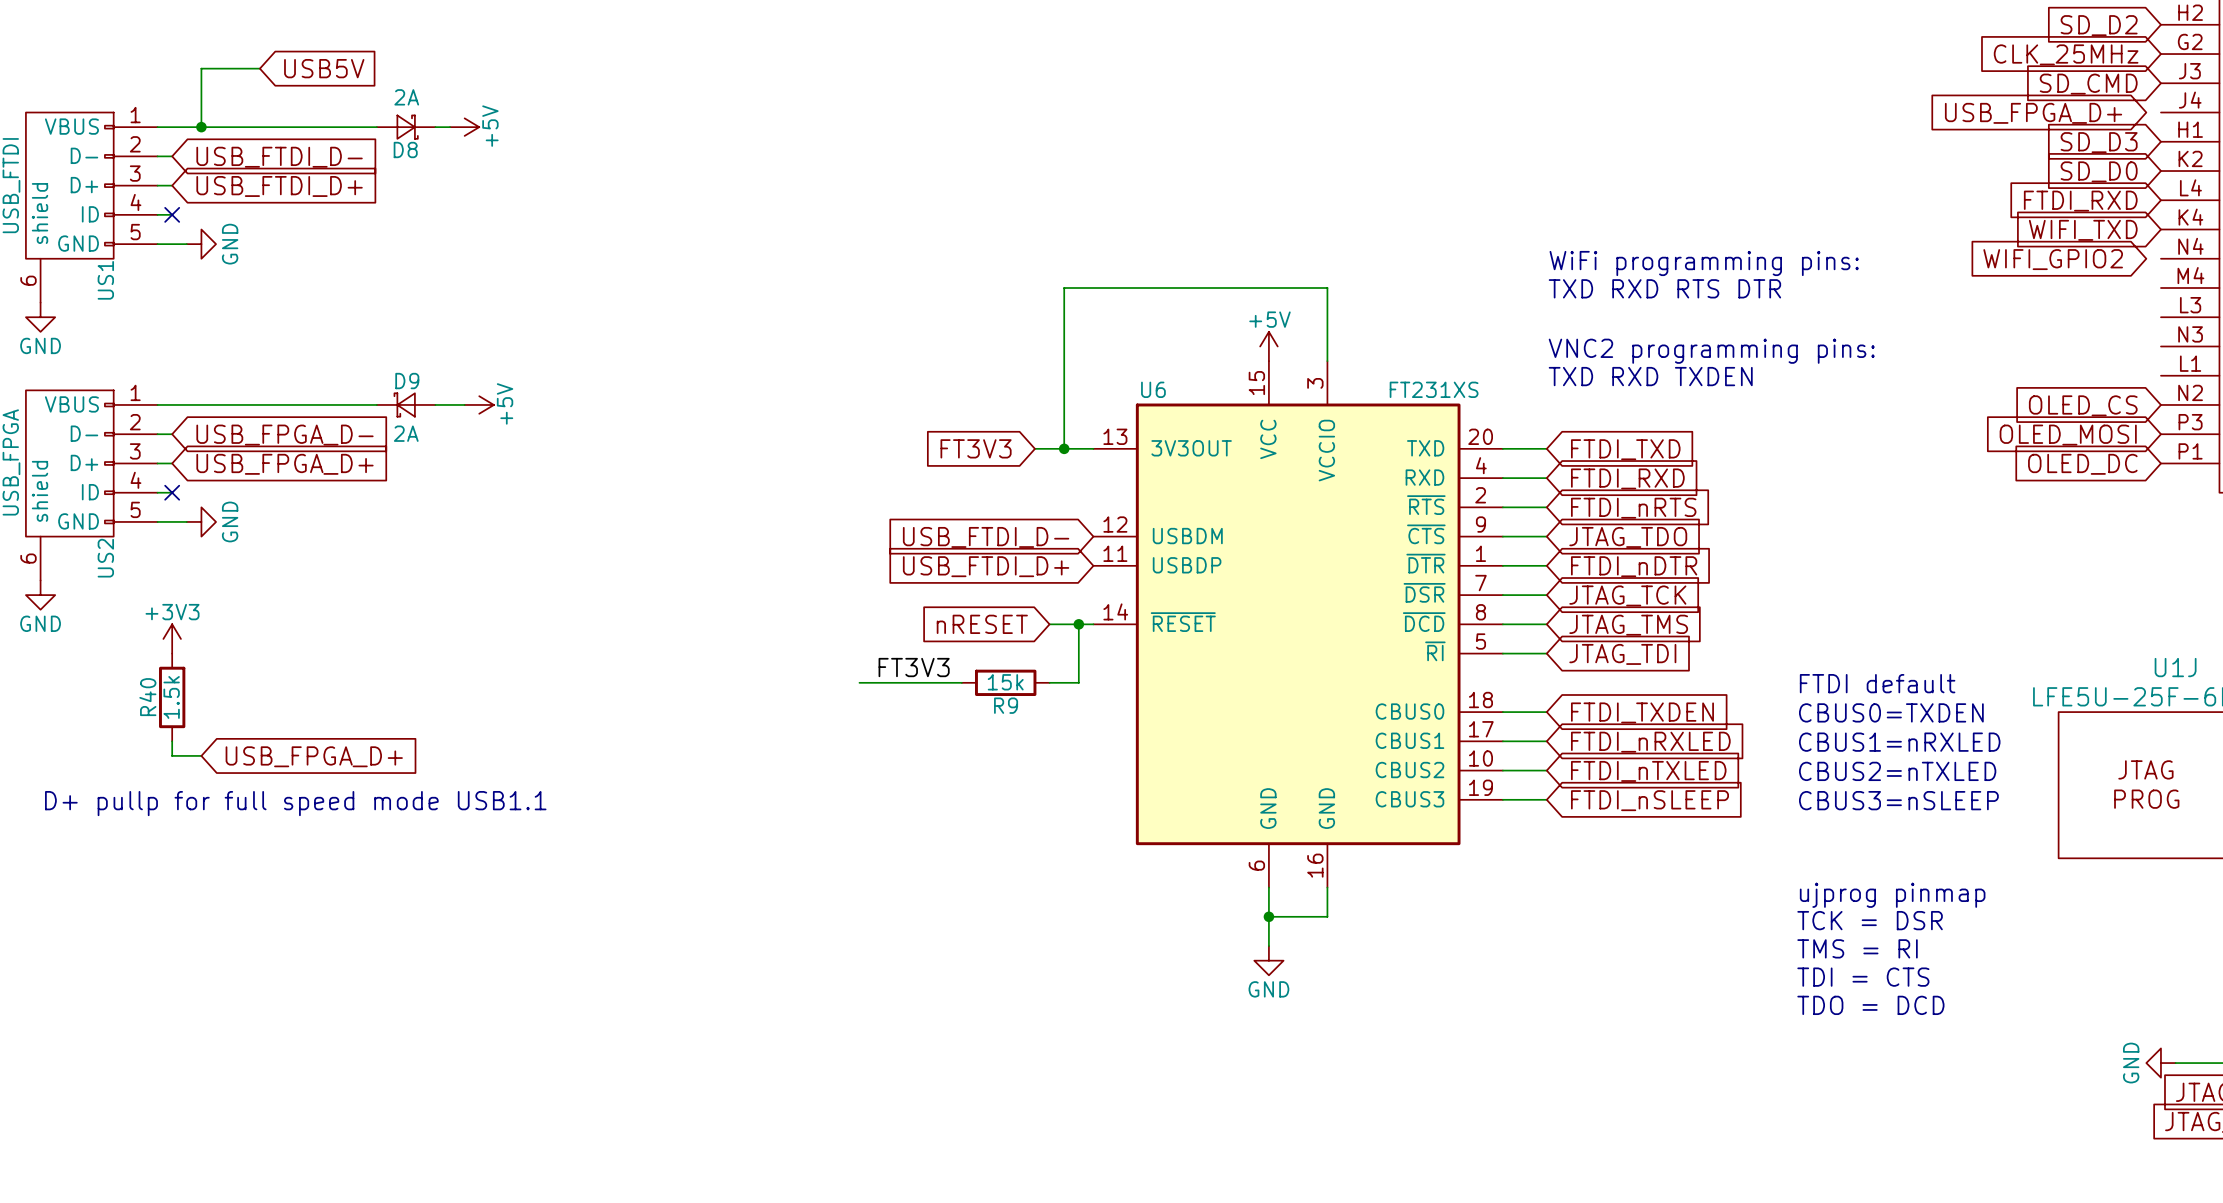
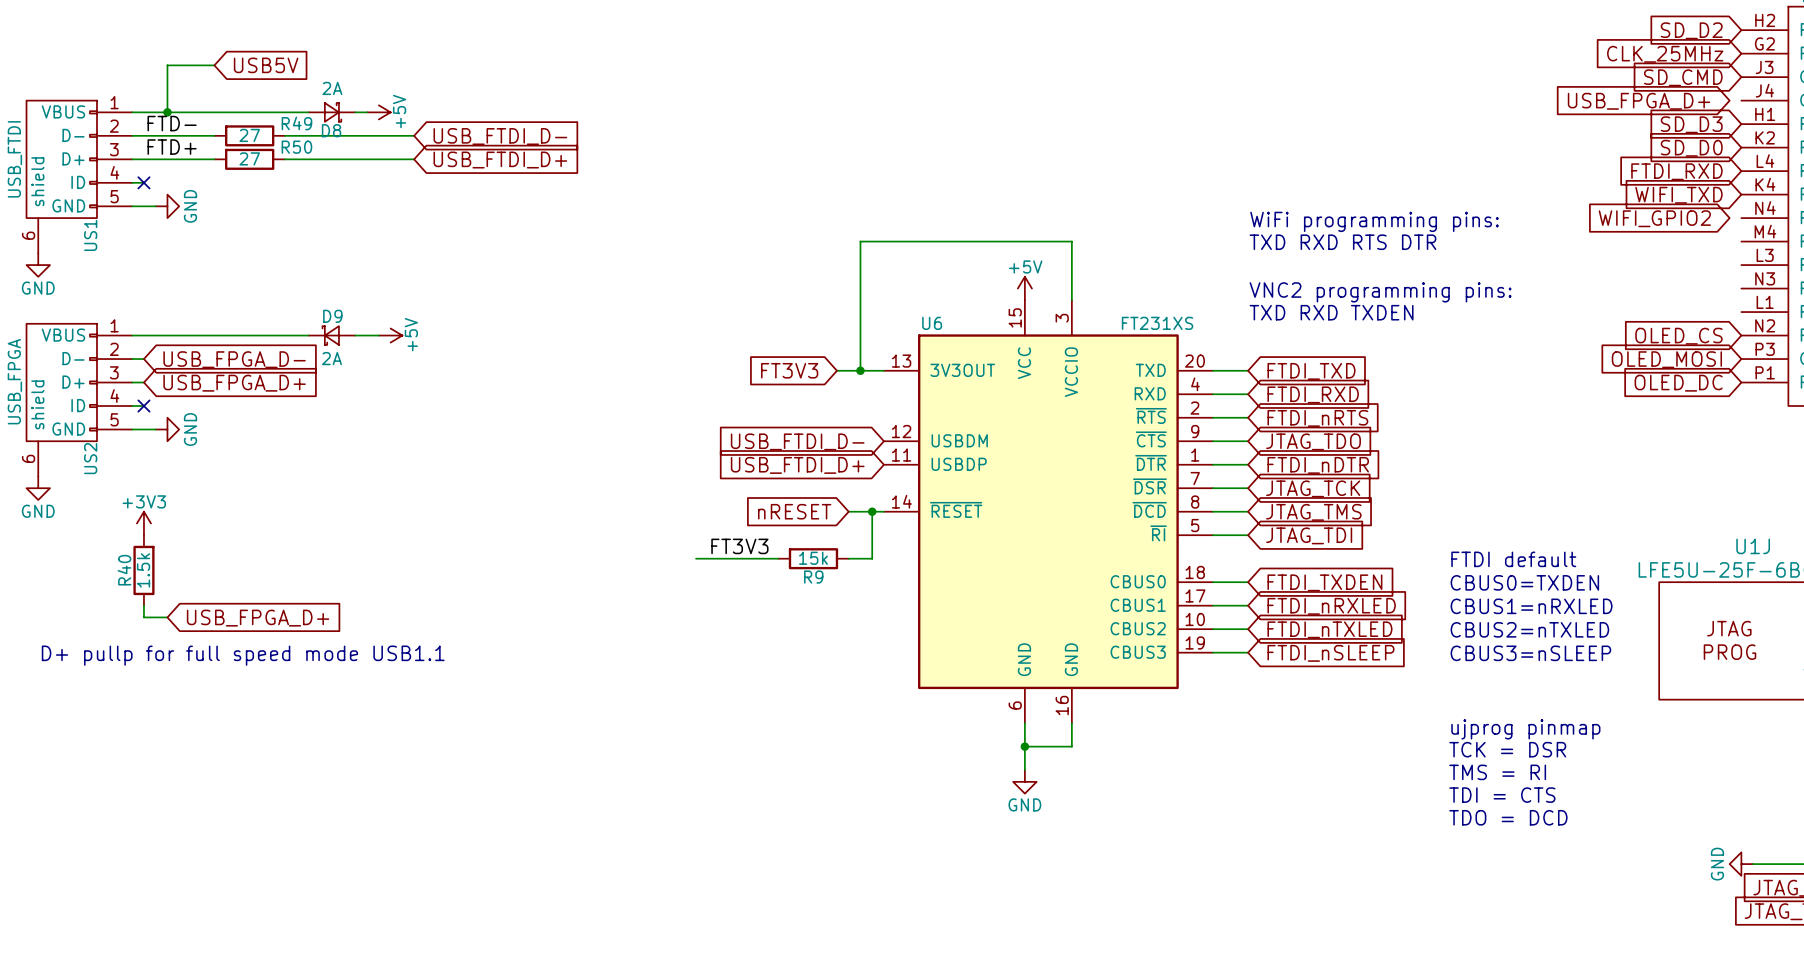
label: none -> FTD- (172, 123)
wire: none -> (143, 135) (214, 135)
R49: none -> 27 (249, 135)
wire: none -> (284, 135) (414, 135)
global label: USB_FTDI_D- (279, 157) -> none
global label: none -> USB_FTDI_D- (500, 136)
label: none -> FTD+ (172, 147)
wire: none -> (143, 159) (214, 159)
R50: none -> 27 (249, 159)
wire: none -> (284, 159) (414, 159)
global label: USB_FTDI_D+ (279, 186) -> none
global label: none -> USB_FTDI_D+ (500, 160)

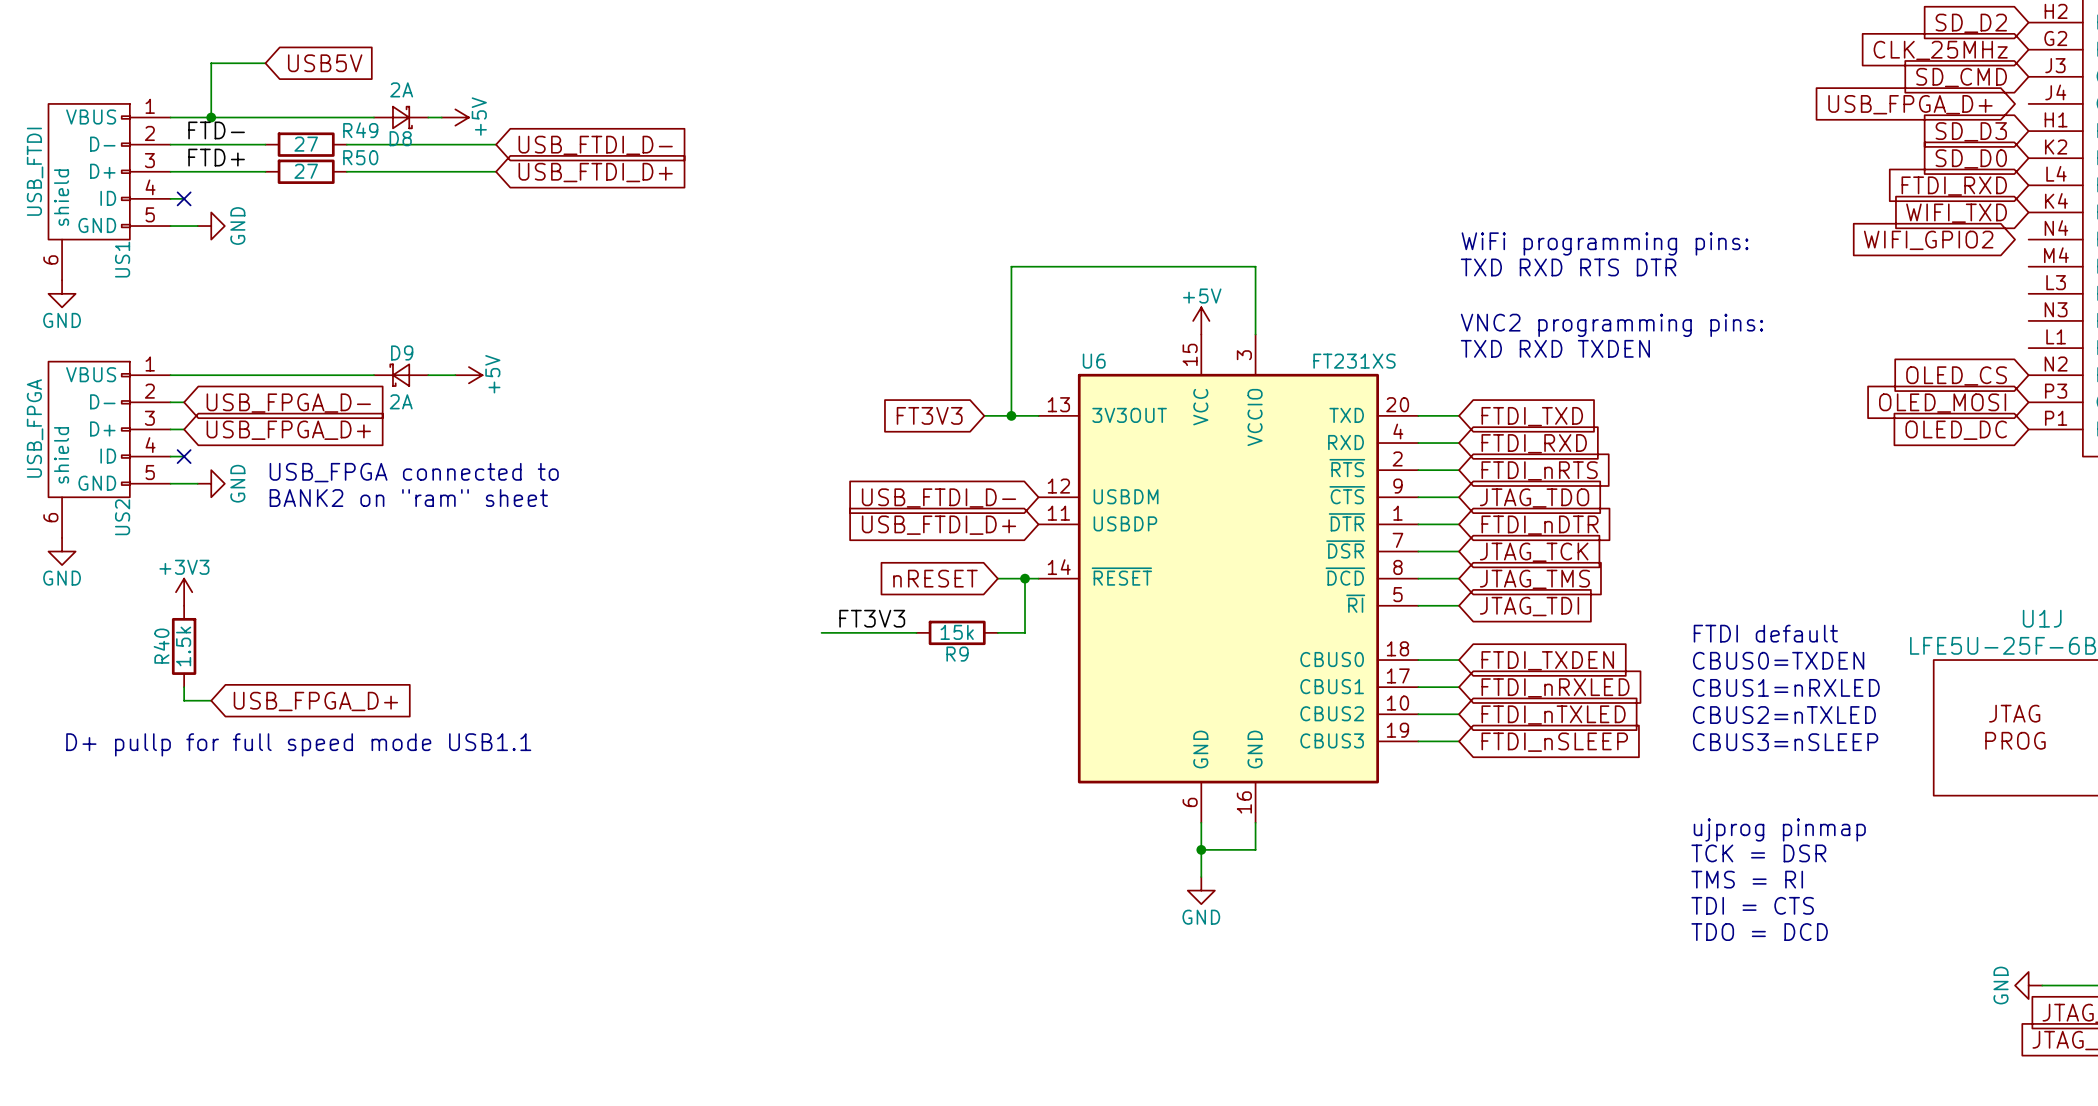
text: none -> USB_FPGA connected to (414, 472)
text: none -> BANK2 on "ram" sheet (408, 498)

